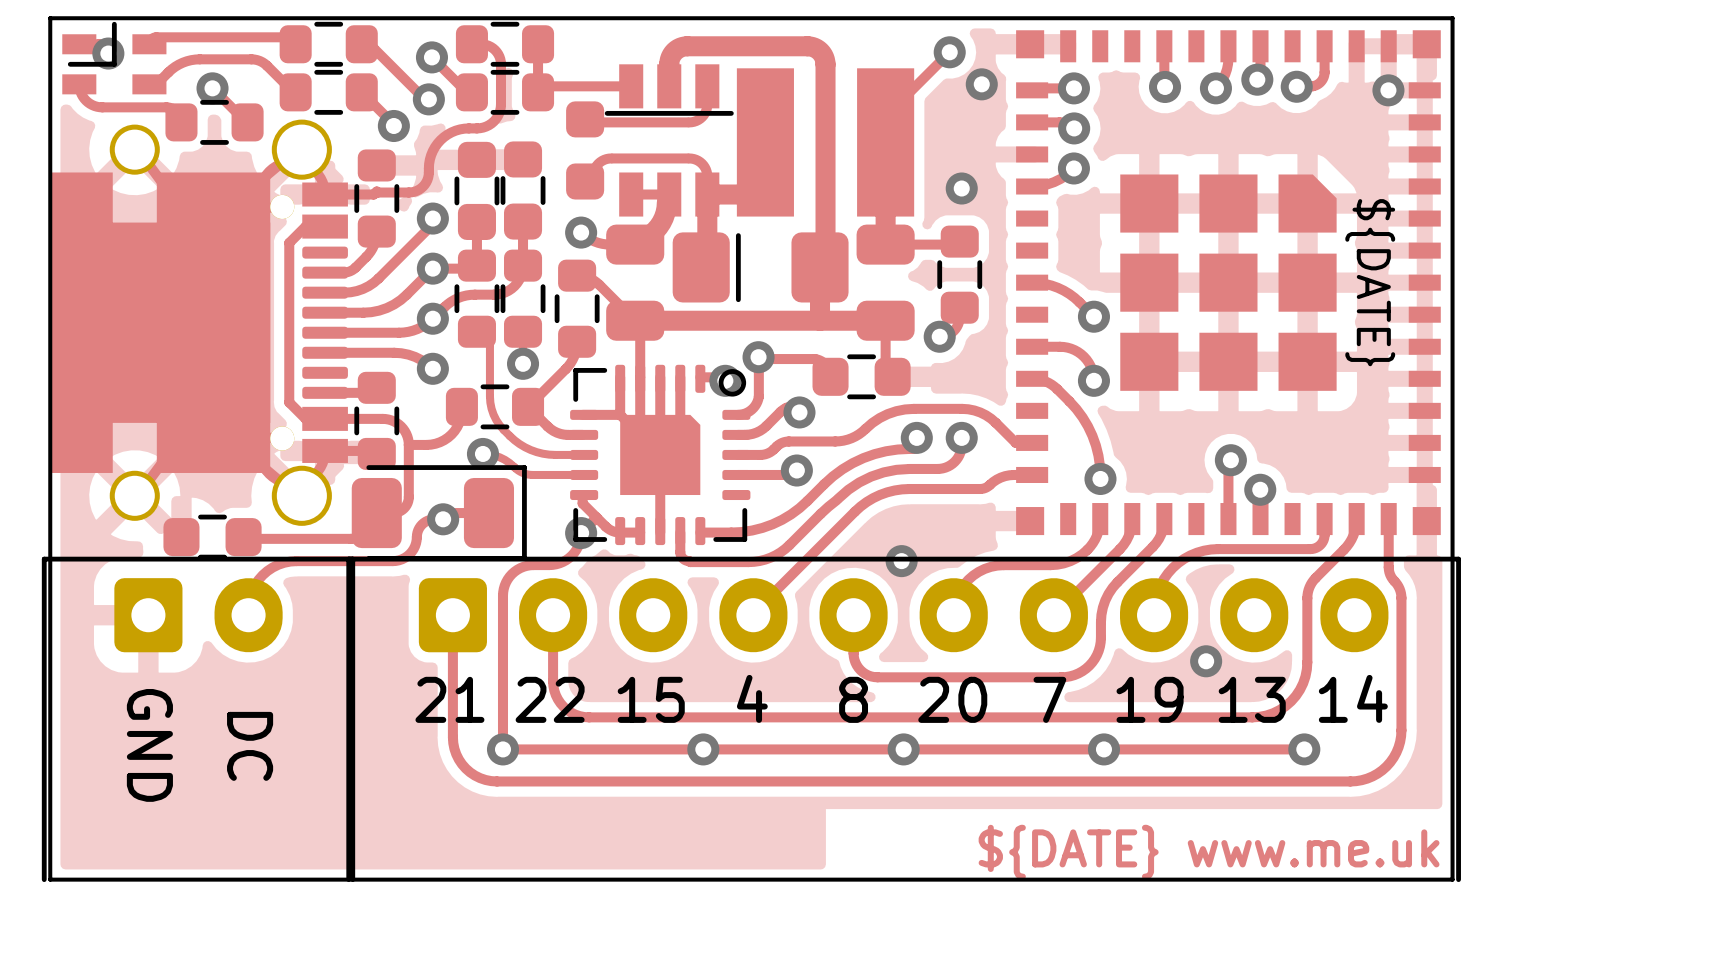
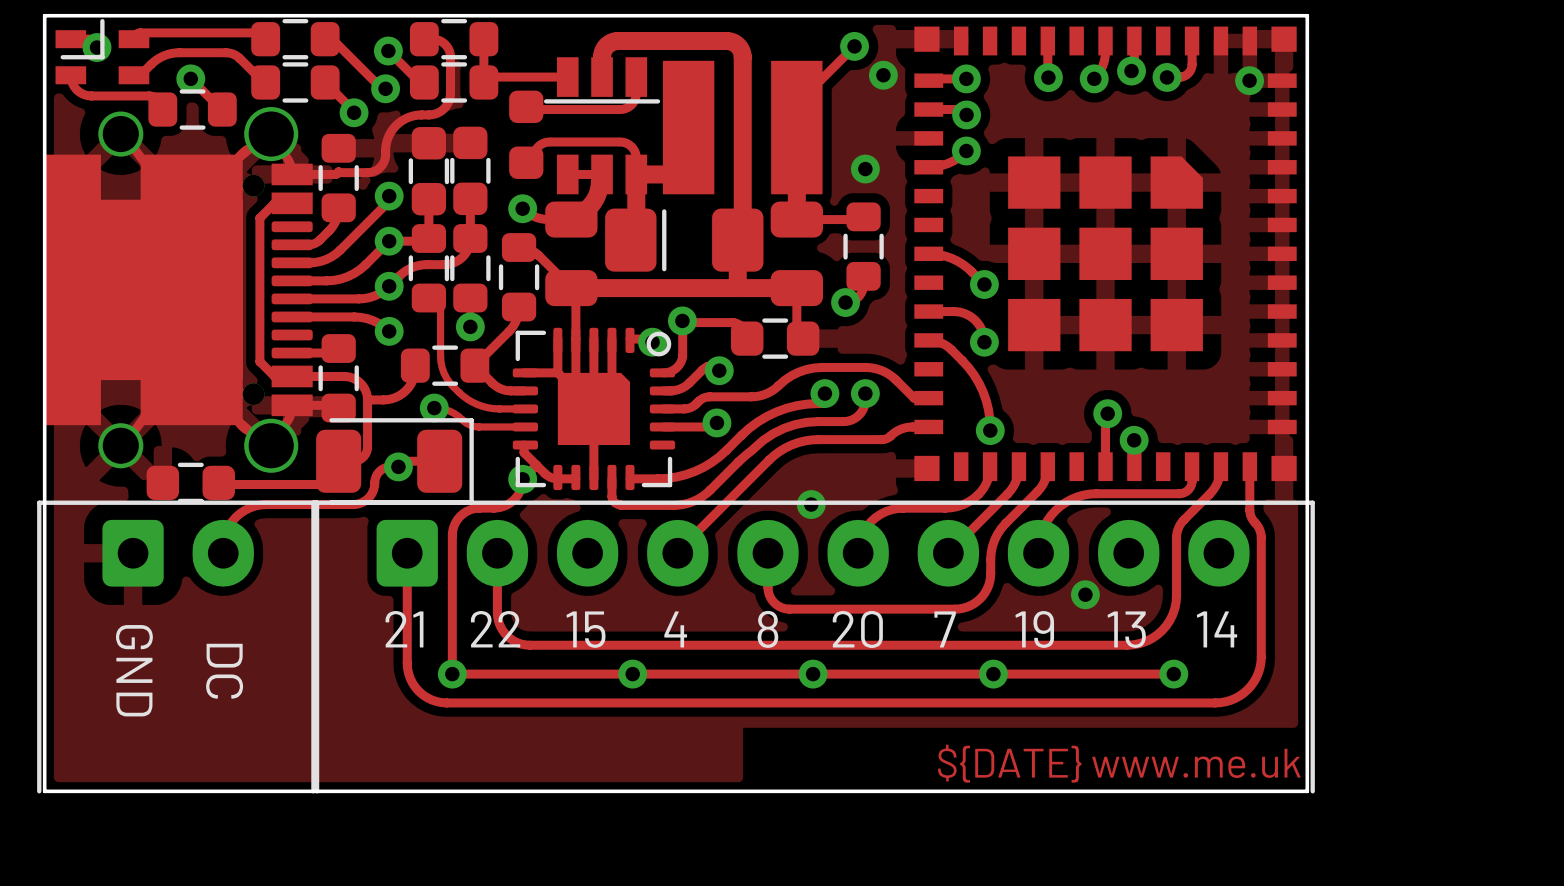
part text: ${DATE} (1370, 282) -> none

